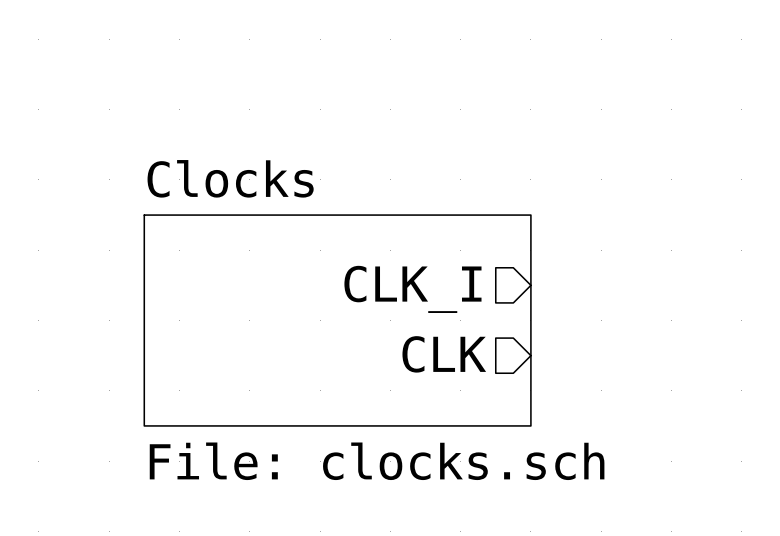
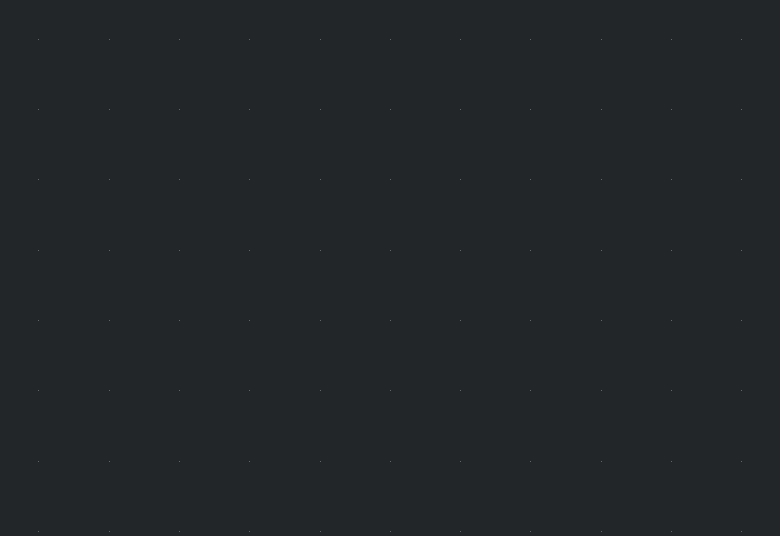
sheet pin: CLK_I (412, 289) -> none
sheet Clocks: File: clocks.sch (337, 320) -> none
sheet pin: CLK (444, 354) -> none

